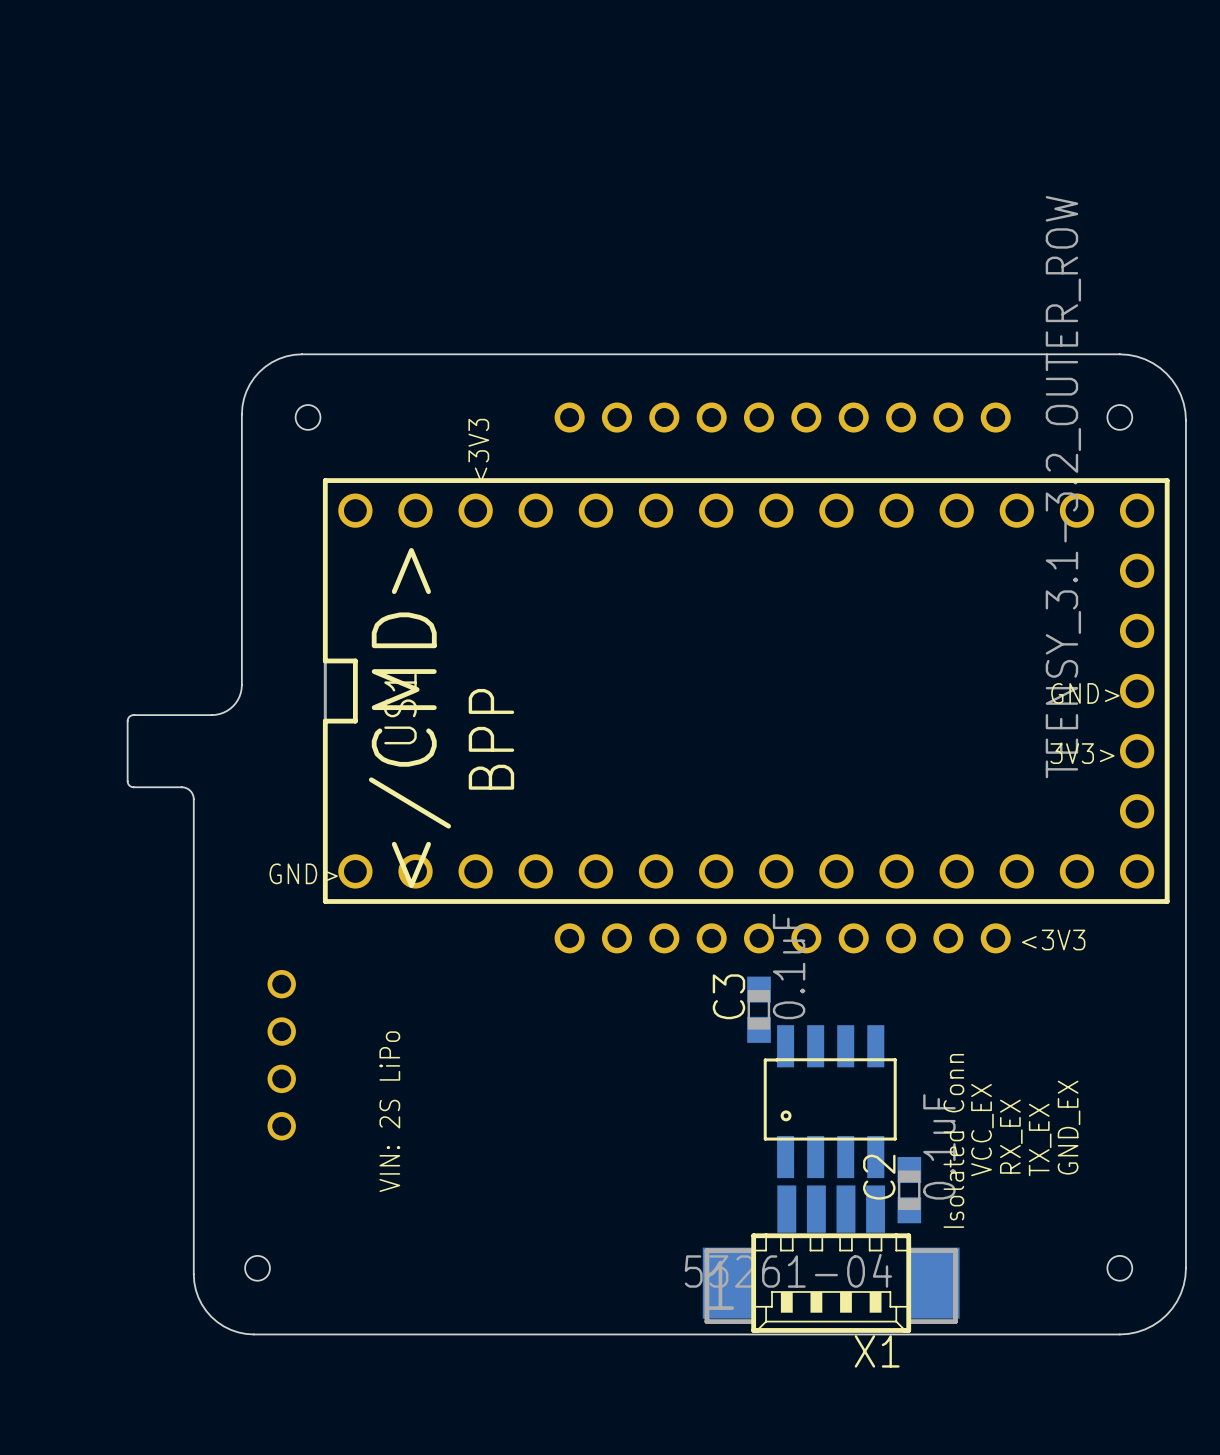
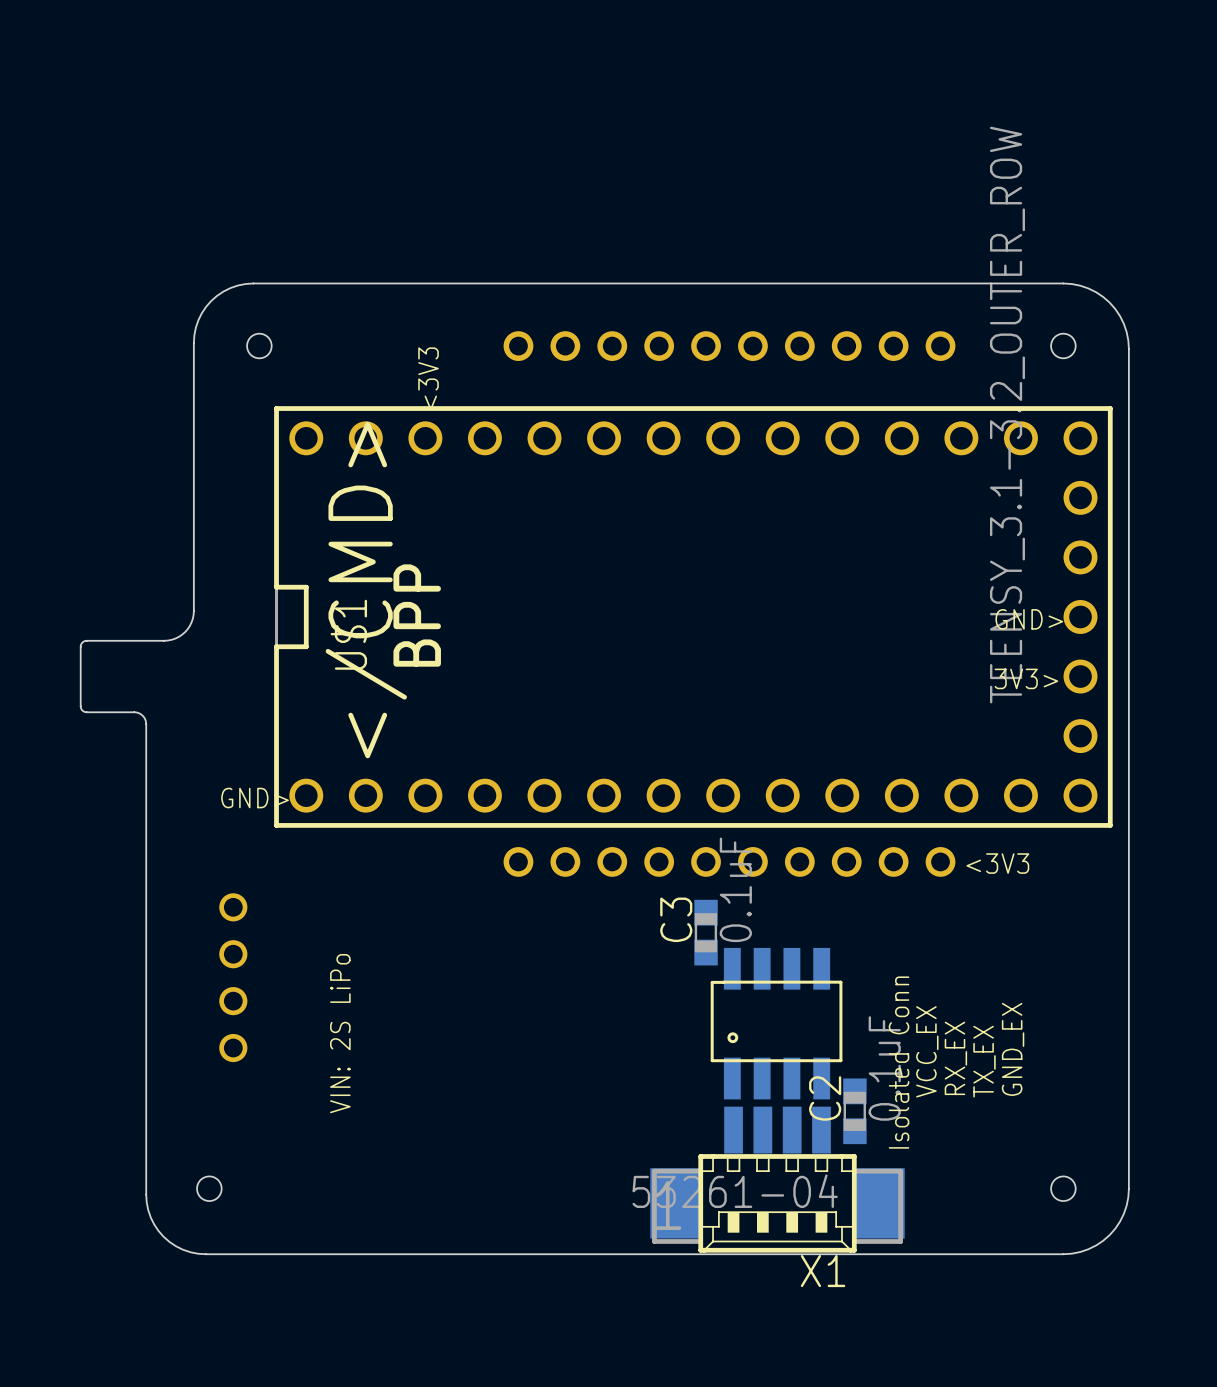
text position: </CMD> (409, 717) -> </CMD> (366, 590)
text position: BPP (491, 739) -> BPP (417, 615)

